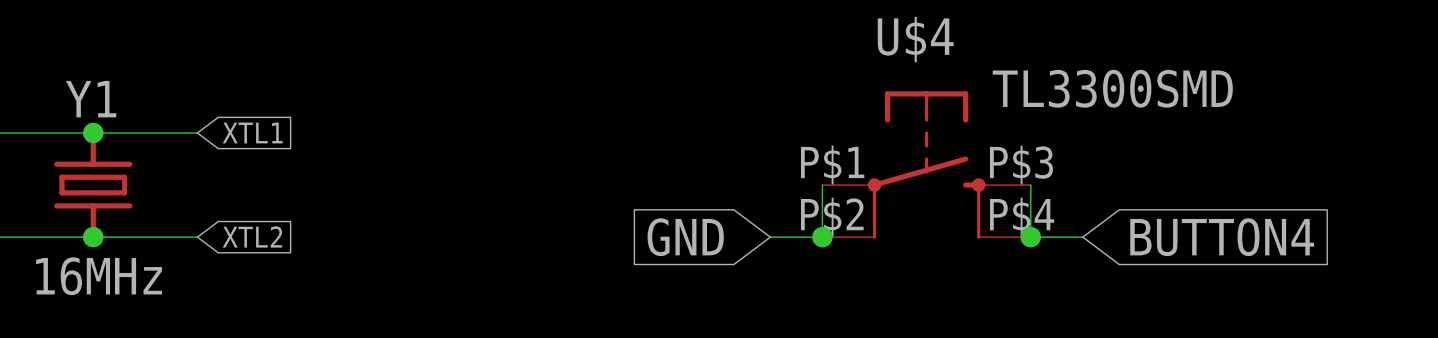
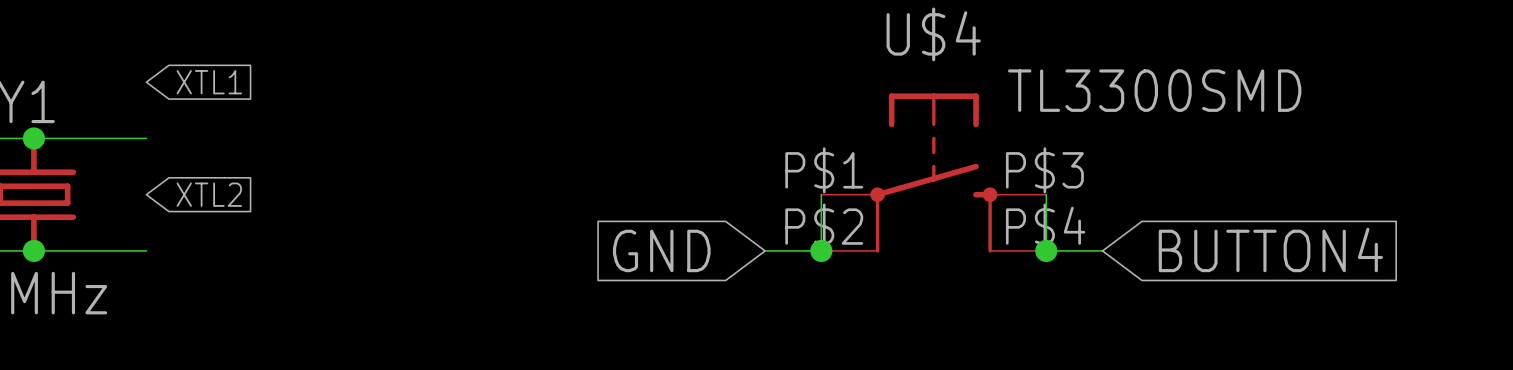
global label position: XTL1 (252, 132) -> XTL1 (209, 82)
global label position: XTL2 (252, 236) -> XTL2 (209, 194)

